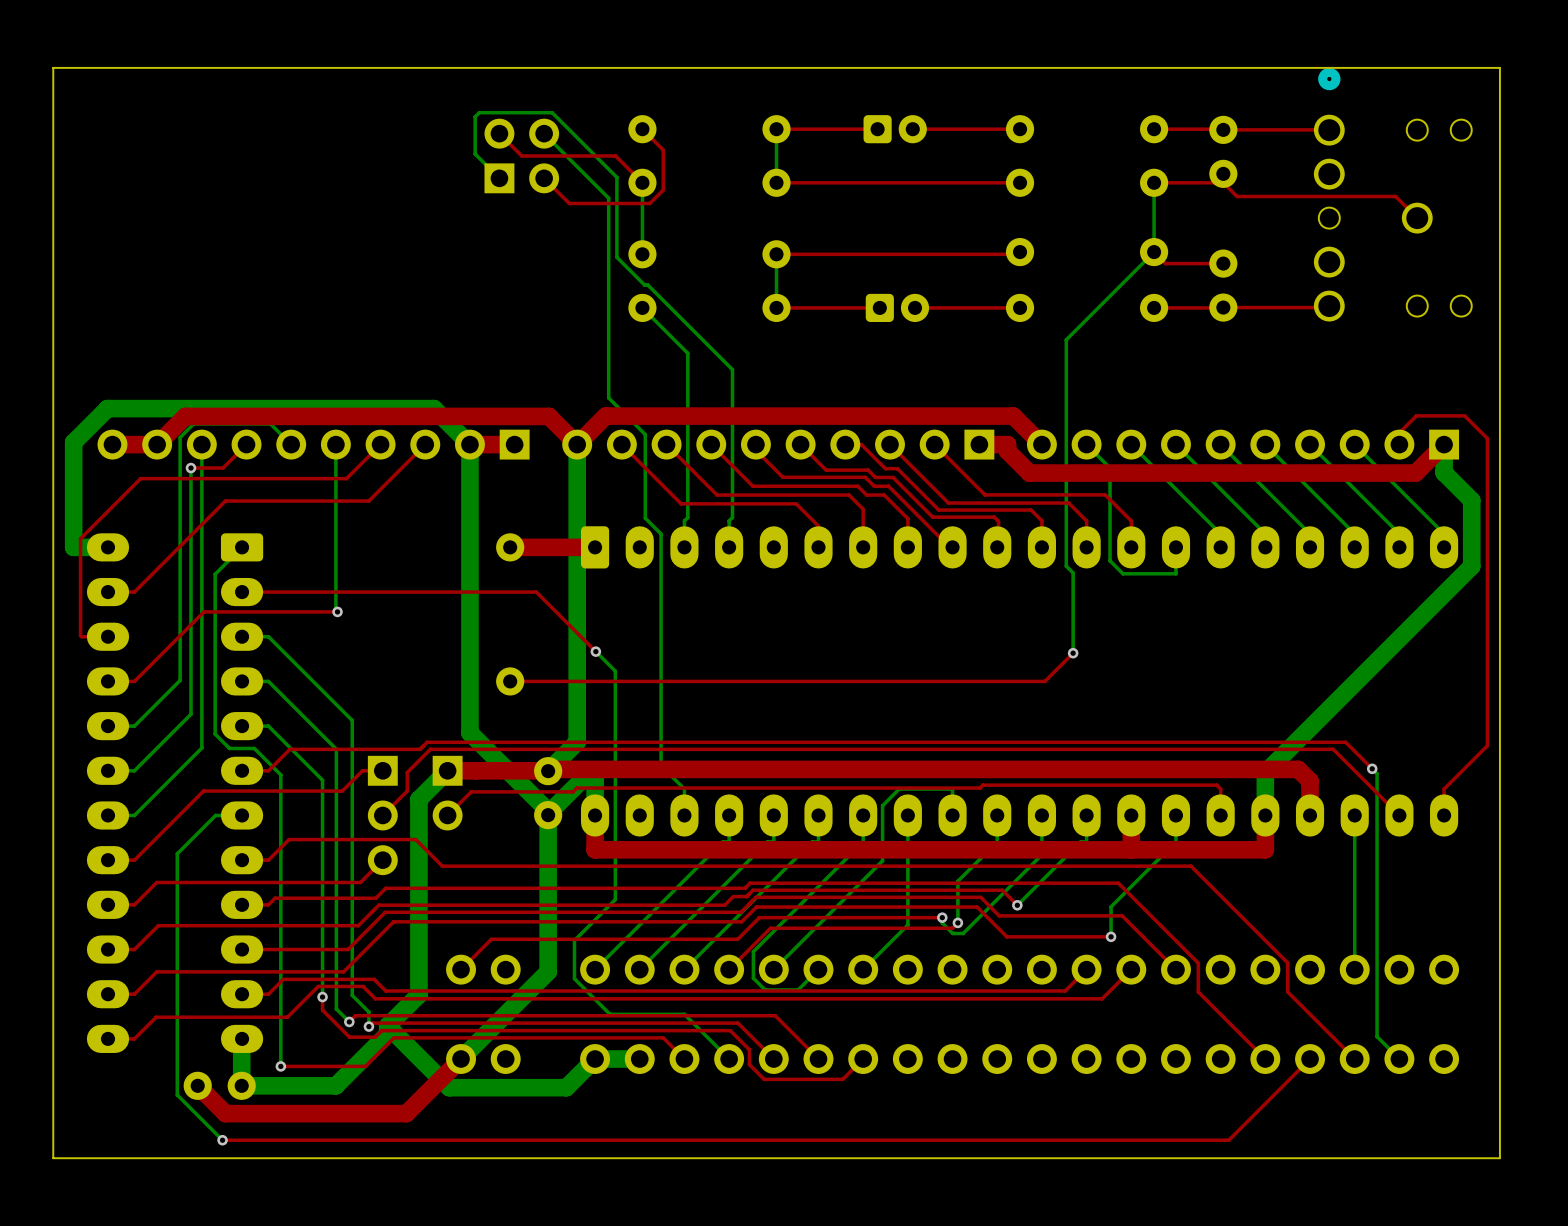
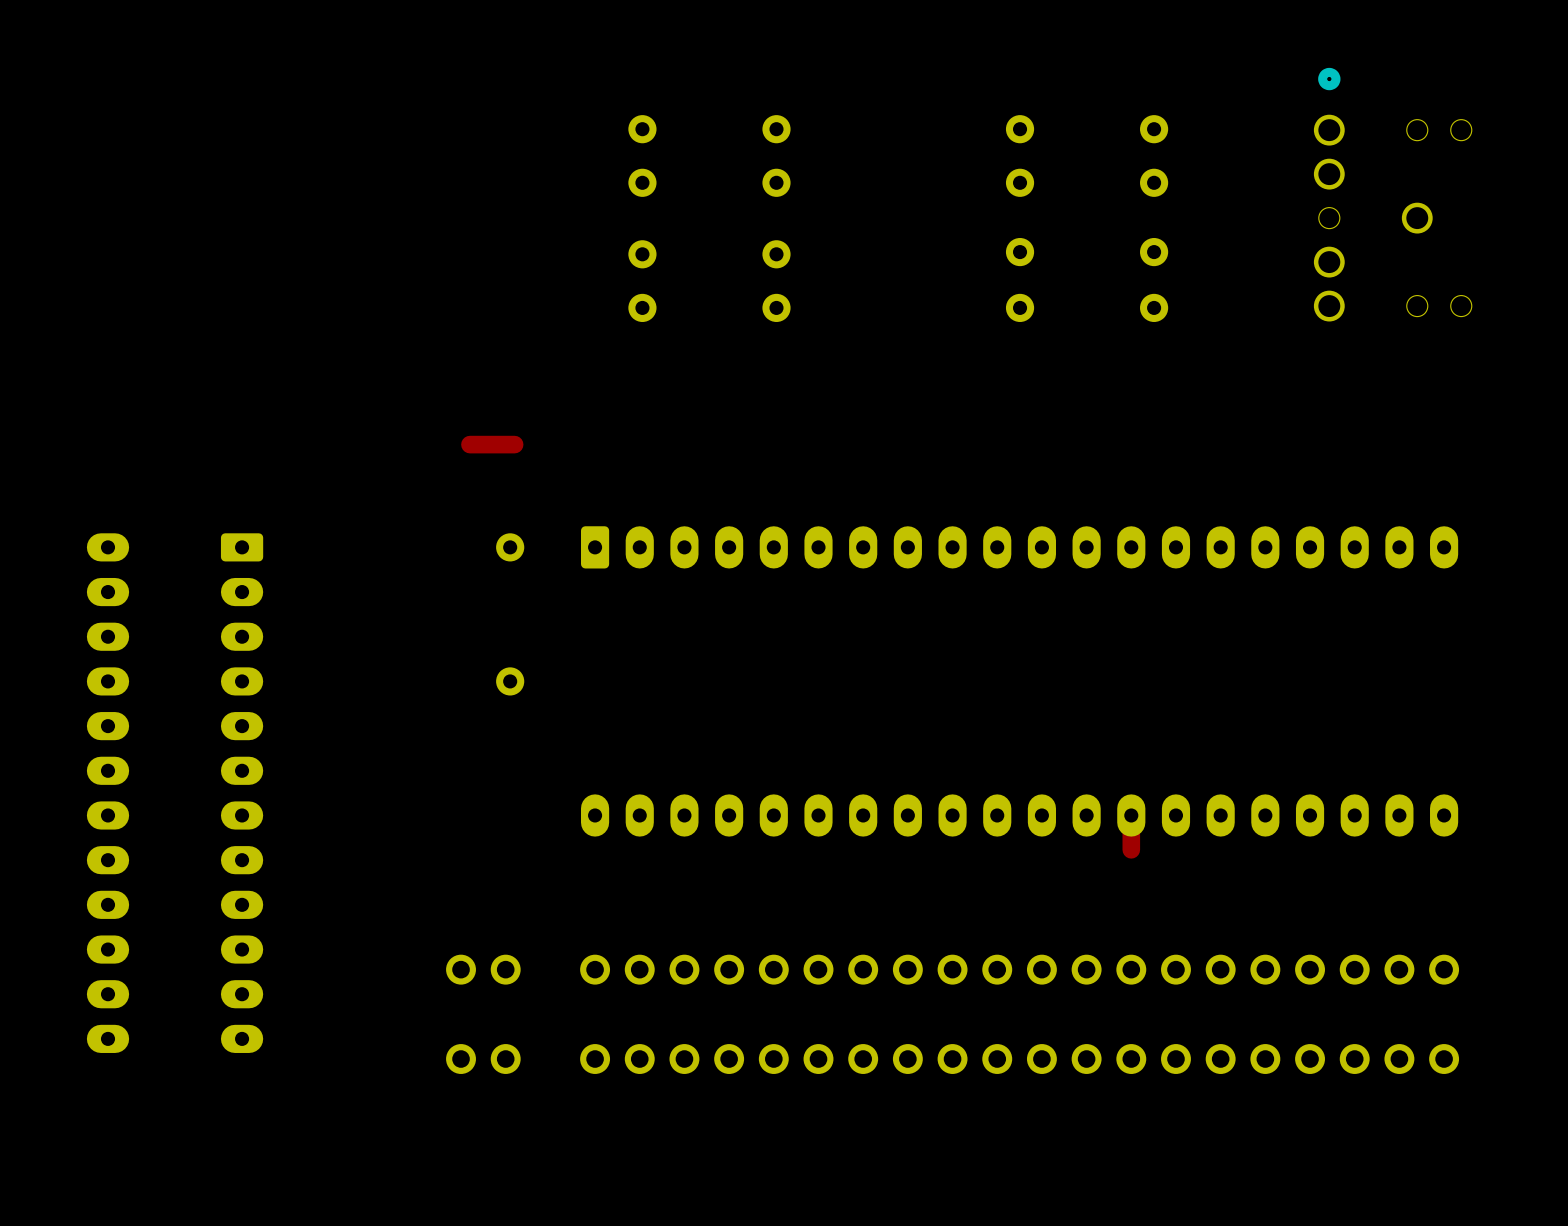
board edge: (53, 67) (1499, 67) (1499, 1158) (53, 1158) (53, 67) -> none
top track: (642, 129) (663, 150) (663, 190) (649, 203) (569, 203) (544, 178) -> none
top track: (776, 129) (877, 129) -> none
bottom track: (776, 129) (776, 182) -> none
part: (895, 129) -> none
top track: (912, 129) (1020, 129) -> none
top track: (1154, 129) (1329, 130) -> none
top track: (499, 133) (521, 155) (615, 155) (642, 182) -> none
bottom track: (544, 133) (608, 198) (608, 397) (645, 434) (645, 518) (661, 533) (661, 765) (684, 789) (684, 815) -> none
part: (1223, 151) -> none
part: (521, 155) -> none
bottom track: (499, 178) (475, 154) (475, 116) (479, 112) (552, 112) (616, 177) (616, 257) (644, 284) (647, 284) (732, 369) (732, 517) (729, 520) (729, 547) -> none
bottom track: (642, 182) (642, 254) -> none
top track: (776, 182) (1020, 182) -> none
top track: (1154, 182) (1223, 182) -> none
bottom track: (1154, 182) (1154, 252) (1066, 339) (1066, 566) (1073, 572) (1073, 653) -> none
top track: (1223, 182) (1237, 196) (1395, 196) (1417, 218) -> none
top track: (1020, 252) (1017, 254) (776, 254) -> none
top track: (1154, 252) (1165, 263) (1223, 263) -> none
bottom track: (776, 254) (776, 307) -> none
part: (1223, 285) -> none
top track: (1329, 306) (1154, 307) -> none
bottom track: (642, 307) (687, 353) (687, 517) (684, 520) (684, 547) -> none
top track: (776, 307) (879, 307) -> none
part: (897, 307) -> none
top track: (915, 307) (1020, 307) -> none
top track: (112, 444) (157, 444) (185, 416) (549, 416) (577, 444) (605, 416) (1013, 416) (1041, 444) -> none
bottom track: (201, 444) (201, 748) (134, 815) (108, 815) -> none
top track: (246, 444) (223, 468) (190, 468) -> none
bottom track: (291, 444) (270, 423) (193, 423) (180, 437) (180, 680) (134, 726) (108, 726) -> none
part: (313, 444) -> none
bottom track: (335, 444) (335, 610) (337, 611) -> none
top track: (380, 444) (346, 478) (140, 478) (80, 538) (80, 635) (108, 636) -> none
top track: (425, 444) (368, 501) (225, 501) (134, 592) (108, 592) -> none
bottom track: (577, 444) (577, 742) (548, 771) -> none
top track: (621, 444) (681, 503) (796, 503) (818, 526) (818, 547) -> none
top track: (666, 444) (717, 495) (849, 495) (863, 509) (863, 547) -> none
top track: (711, 444) (752, 486) (857, 486) (866, 495) (884, 495) (907, 518) (907, 547) -> none
top track: (755, 444) (755, 450) (782, 477) (865, 477) (874, 486) (888, 486) (949, 547) (952, 547) -> none
part: (778, 444) -> none
top track: (800, 444) (826, 470) (868, 470) (875, 477) (893, 477) (932, 517) (994, 517) (998, 521) (997, 547) -> none
top track: (845, 444) (861, 444) (885, 468) (897, 468) (938, 510) (1031, 510) (1041, 520) (1041, 547) -> none
top track: (889, 444) (948, 503) (1068, 503) (1086, 520) (1086, 547) -> none
top track: (934, 444) (985, 494) (1105, 494) (1131, 520) (1131, 547) -> none
top track: (979, 444) (1007, 444) (1007, 451) (1029, 473) (1415, 473) (1444, 444) -> none
bottom track: (1086, 444) (1110, 468) (1110, 560) (1122, 573) (1175, 573) (1175, 547) -> none
bottom track: (1131, 444) (1220, 533) (1220, 547) -> none
bottom track: (1175, 444) (1265, 533) (1265, 547) -> none
bottom track: (1220, 444) (1310, 533) (1310, 547) -> none
part: (1243, 444) -> none
bottom track: (1265, 444) (1354, 533) (1354, 547) -> none
bottom track: (1310, 444) (1399, 533) (1399, 547) -> none
bottom track: (1354, 444) (1444, 533) (1444, 547) -> none
top track: (1399, 444) (1399, 432) (1416, 415) (1464, 415) (1487, 438) (1487, 745) (1444, 789) (1444, 815) -> none
bottom track: (1444, 444) (1444, 472) (1471, 500) (1471, 566) (1265, 772) (1265, 815) -> none
bottom track: (190, 468) (190, 714) (134, 770) (108, 770) -> none
via: (190, 468) -> none
bottom track: (108, 547) (73, 547) (73, 442) (107, 408) (433, 408) (469, 444) (469, 732) (549, 812) -> none
bottom track: (242, 547) (215, 574) (215, 734) (229, 748) (254, 748) (280, 774) (280, 1066) -> none
top track: (510, 547) (595, 547) -> none
top track: (242, 592) (536, 592) (595, 651) -> none
top track: (337, 611) (203, 611) (134, 681) (108, 681) -> none
via: (337, 611) -> none
bottom track: (242, 636) (268, 636) (352, 720) (352, 995) (368, 1012) (368, 1026) -> none
bottom track: (595, 651) (615, 671) (615, 899) (574, 940) (574, 978) (610, 1014) (684, 1014) (729, 1059) -> none
via: (595, 651) -> none
top track: (1073, 653) (1044, 681) (510, 681) -> none
via: (1073, 653) -> none
bottom track: (242, 681) (268, 681) (336, 749) (336, 1008) (349, 1021) -> none
bottom track: (242, 726) (268, 726) (322, 780) (322, 997) -> none
top track: (1372, 768) (1345, 742) (427, 742) (420, 749) (289, 749) (268, 770) (242, 770) -> none
bottom track: (1372, 768) (1377, 773) (1377, 1036) (1399, 1059) -> none
via: (1372, 768) -> none
top track: (382, 770) (362, 770) (342, 791) (203, 791) (134, 860) (108, 860) -> none
top track: (447, 770) (548, 770) -> none
bottom track: (447, 770) (418, 799) (418, 994) (387, 1026) -> none
top track: (548, 770) (1298, 769) (1310, 781) (1310, 815) -> none
part: (447, 793) -> none
part: (548, 793) -> none
bottom track: (549, 812) (548, 971) (461, 1059) -> none
bottom track: (549, 812) (580, 781) (595, 781) (595, 815) -> none
bottom track: (242, 815) (215, 815) (177, 853) (177, 1095) (222, 1140) -> none
top track: (382, 815) (407, 791) (407, 772) (430, 749) (1333, 749) (1399, 815) -> none
part: (382, 815) -> none
top track: (447, 815) (471, 791) (573, 791) (576, 788) (980, 788) (983, 785) (1216, 785) (1220, 789) (1220, 815) -> none
top track: (595, 815) (595, 849) (1265, 849) (1265, 815) -> none
bottom track: (729, 815) (729, 841) (722, 841) (595, 969) -> none
bottom track: (773, 815) (773, 841) (767, 841) (639, 969) -> none
bottom track: (818, 815) (818, 841) (812, 841) (684, 969) -> none
bottom track: (863, 815) (863, 841) (753, 951) (753, 978) (765, 989) (798, 989) (818, 969) -> none
bottom track: (907, 815) (907, 924) (863, 969) -> none
bottom track: (952, 815) (952, 789) (899, 789) (882, 805) (882, 860) (773, 969) -> none
bottom track: (997, 815) (997, 841) (957, 881) (957, 922) -> none
bottom track: (1041, 815) (1041, 854) (963, 933) (952, 933) (942, 923) (942, 917) -> none
bottom track: (1086, 815) (1086, 841) (1080, 841) (1017, 905) -> none
bottom track: (1175, 815) (1175, 841) (1111, 906) (1111, 936) -> none
bottom track: (1354, 815) (1354, 969) -> none
top track: (242, 860) (268, 860) (289, 839) (415, 839) (442, 866) (1190, 866) (1287, 962) (1287, 991) (1354, 1059) -> none
top track: (382, 860) (360, 882) (156, 882) (134, 904) (108, 904) -> none
top track: (242, 904) (268, 904) (275, 898) (375, 898) (385, 888) (745, 888) (750, 883) (1118, 883) (1198, 963) (1198, 991) (1265, 1059) -> none
top track: (1017, 905) (1002, 890) (753, 890) (746, 896) (733, 896) (724, 905) (378, 905) (358, 925) (158, 925) (134, 949) (108, 949) -> none
via: (1017, 905) -> none
top track: (942, 917) (759, 917) (737, 939) (491, 939) (461, 969) -> none
via: (942, 917) -> none
top track: (957, 922) (952, 928) (770, 928) (729, 969) -> none
via: (957, 922) -> none
top track: (1111, 936) (1006, 936) (977, 907) (756, 907) (741, 921) (393, 921) (343, 971) (156, 971) (134, 994) (108, 994) -> none
via: (1111, 936) -> none
top track: (242, 949) (348, 949) (385, 912) (741, 912) (756, 897) (980, 897) (999, 915) (1122, 915) (1175, 969) -> none
top track: (1086, 969) (1065, 991) (385, 991) (374, 979) (283, 979) (268, 994) (242, 994) -> none
top track: (1131, 969) (1102, 998) (375, 998) (363, 986) (318, 986) (287, 1017) (156, 1017) (134, 1038) (108, 1038) -> none
top track: (322, 997) (322, 1010) (349, 1037) (375, 1037) (381, 1030) (730, 1030) (749, 1049) (749, 1064) (764, 1079) (842, 1079) (863, 1059) -> none
via: (322, 997) -> none
top track: (349, 1021) (355, 1015) (775, 1015) (818, 1059) -> none
via: (349, 1021) -> none
top track: (368, 1026) (372, 1023) (737, 1023) (773, 1059) -> none
via: (368, 1026) -> none
bottom track: (387, 1026) (387, 1034) (335, 1085) (241, 1085) (242, 1038) -> none
bottom track: (387, 1026) (449, 1087) (566, 1087) (595, 1059) (639, 1059) -> none
top track: (461, 1059) (406, 1113) (225, 1113) (197, 1085) -> none
top track: (684, 1059) (663, 1037) (393, 1037) (365, 1066) (280, 1066) -> none
top track: (1310, 1059) (1228, 1140) (222, 1140) -> none
via: (280, 1066) -> none
part: (219, 1085) -> none
via: (222, 1140) -> none

